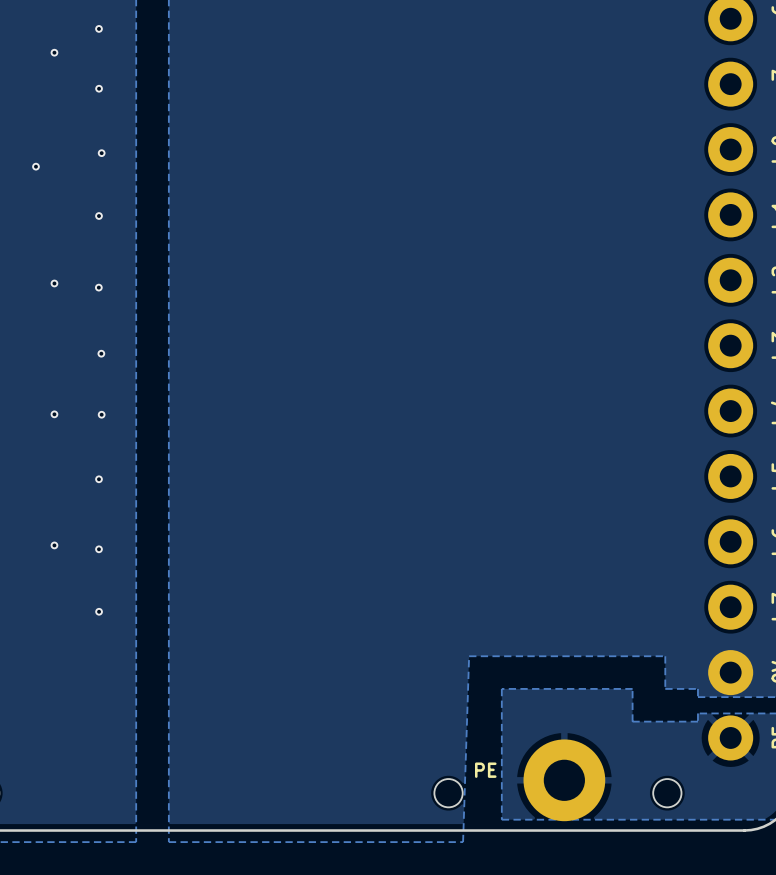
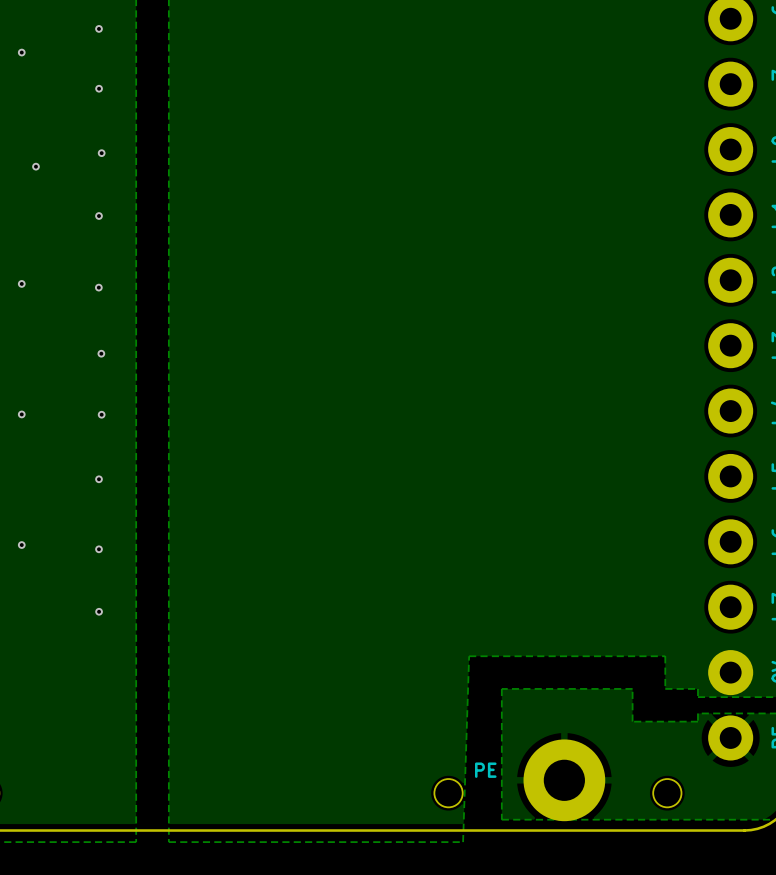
via: none -> (21, 52)
via: (54, 52) -> none
via: none -> (21, 283)
via: (54, 283) -> none
via position: (54, 414) -> (21, 414)
via: none -> (21, 545)
via: (54, 545) -> none

